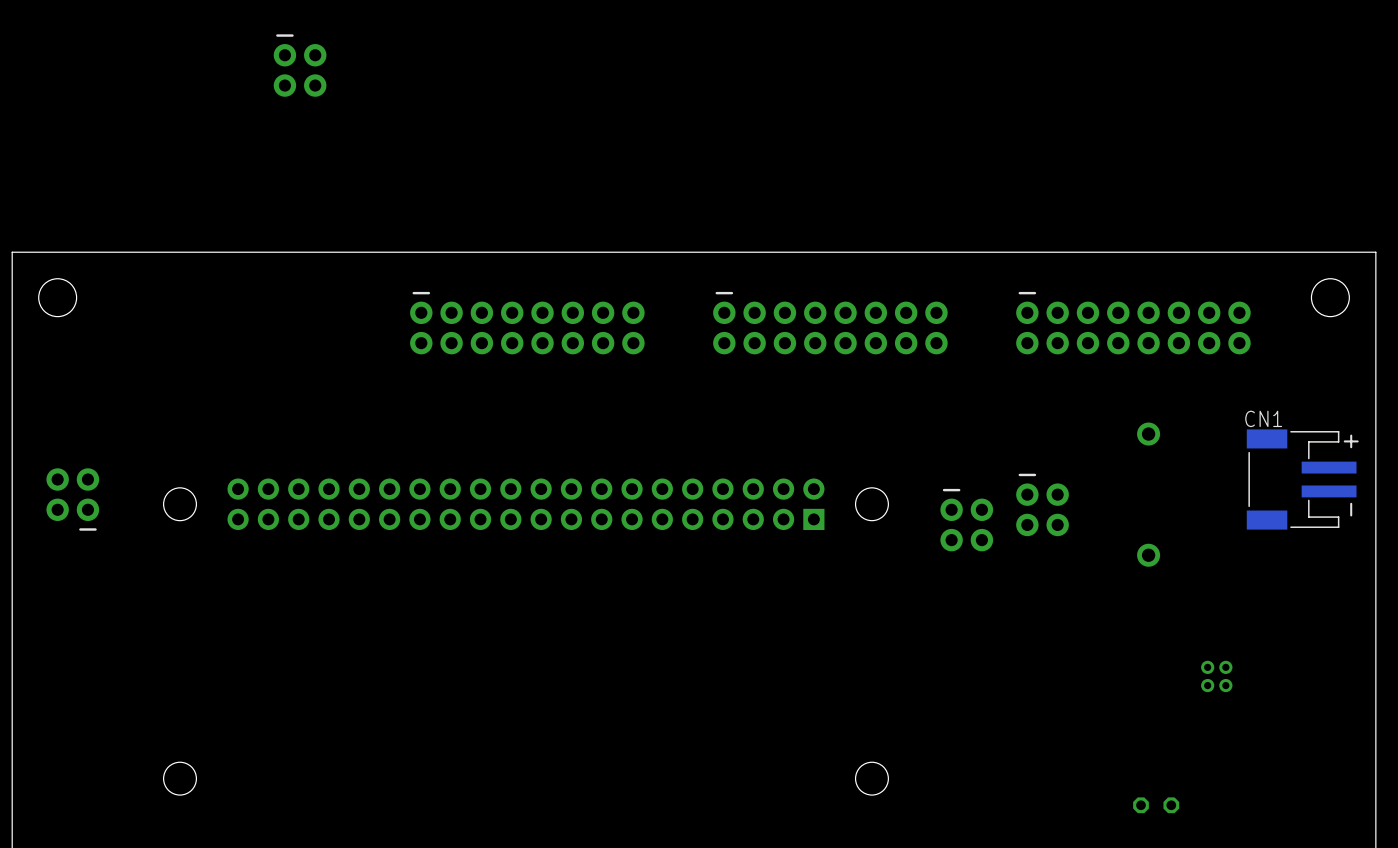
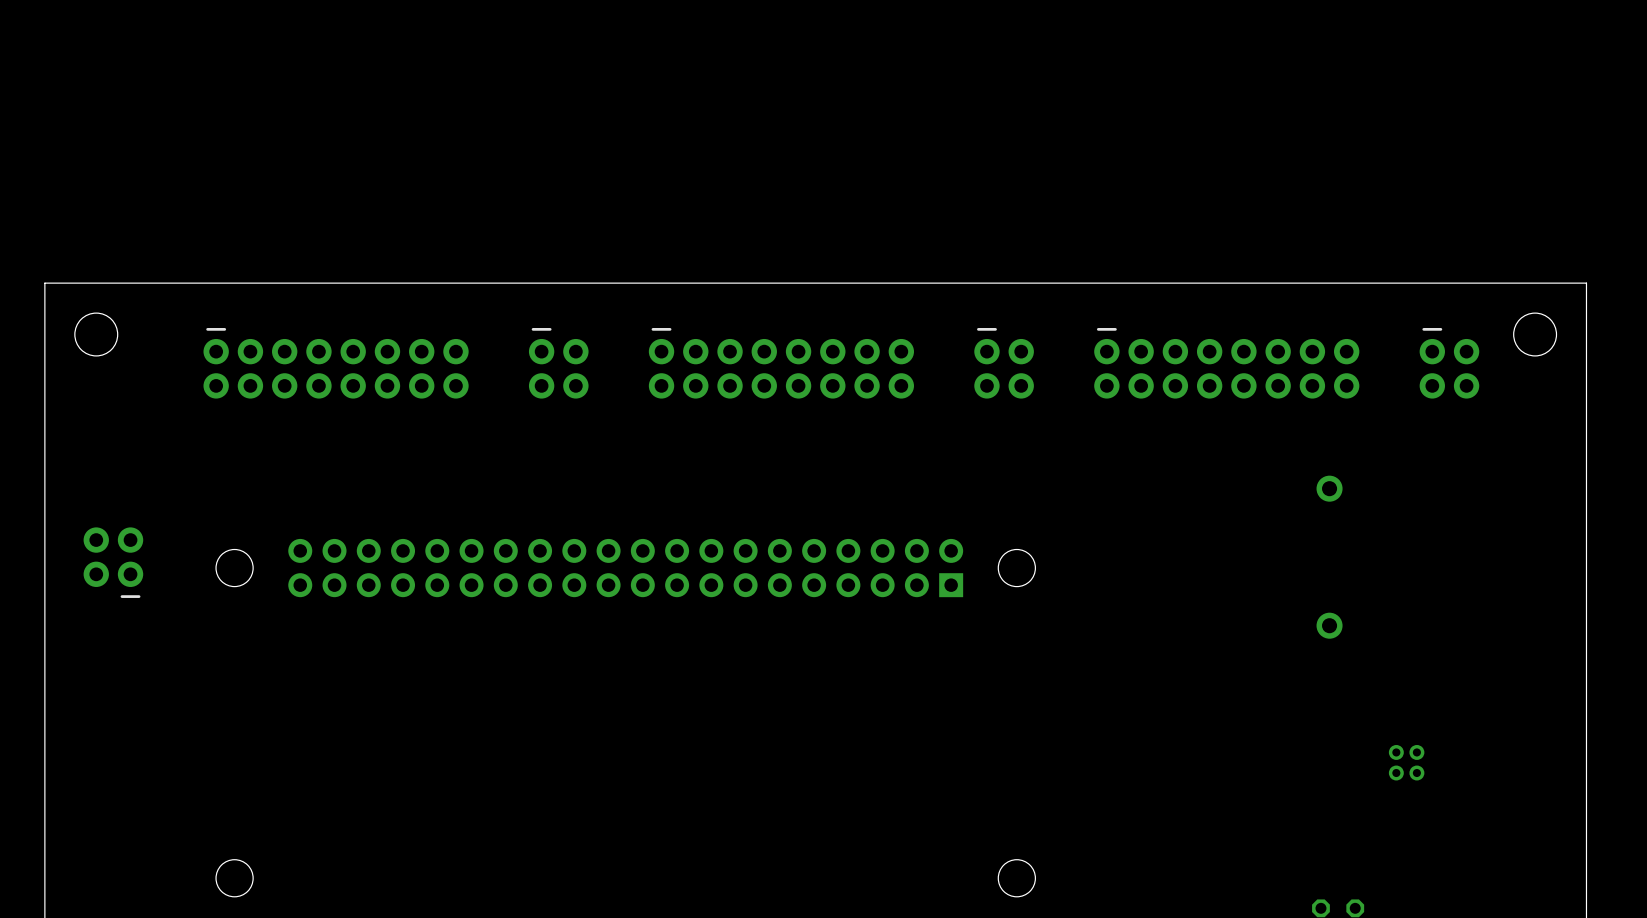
part: (300, 65) -> none
part: none -> (336, 363)
part: none -> (558, 363)
part: (527, 323) -> none
part: none -> (781, 363)
part: (830, 323) -> none
part: none -> (1004, 363)
part position: (1133, 323) -> (1226, 363)
part: none -> (1449, 363)
CN1: (1301, 479) -> none
part: (1042, 504) -> none
part: (966, 520) -> none

